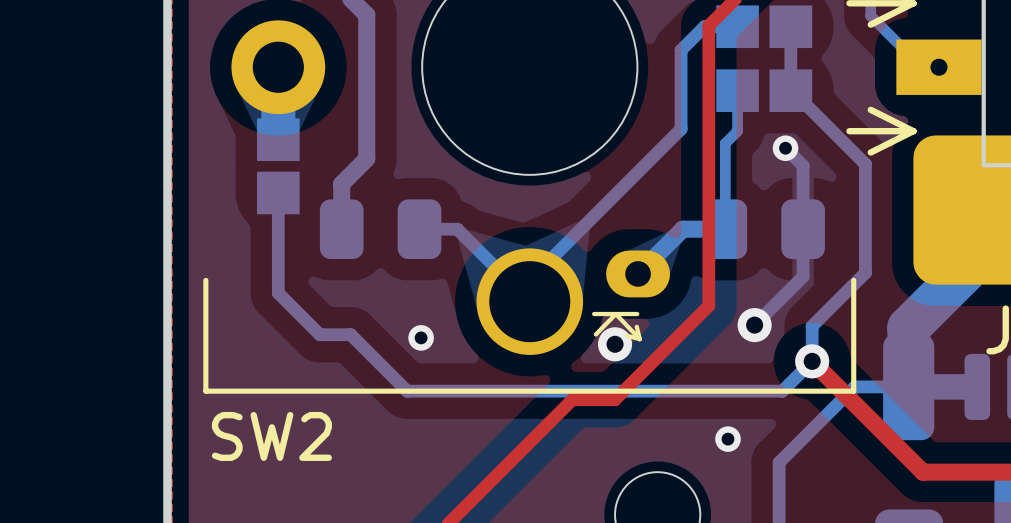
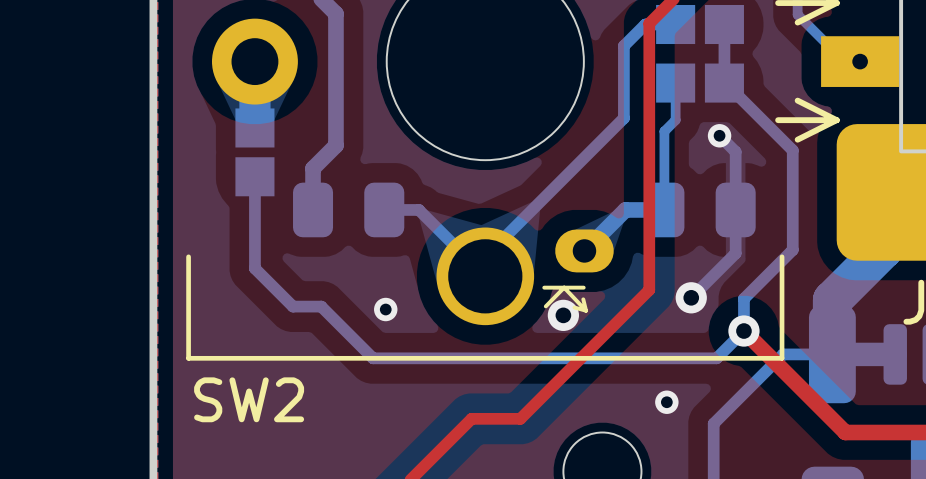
top track: (708, 305) (615, 399) (572, 399) (514, 457) -> (649, 280) (649, 289) (520, 418) (471, 418)

